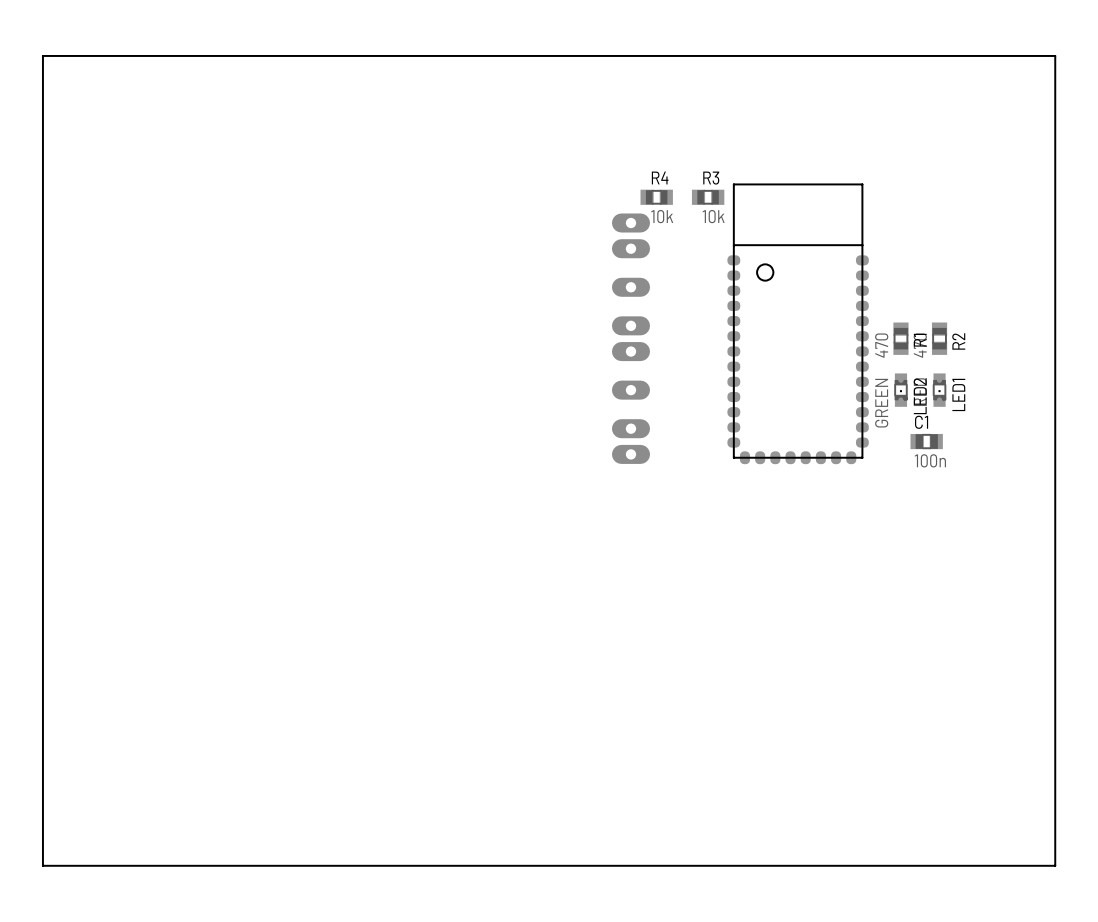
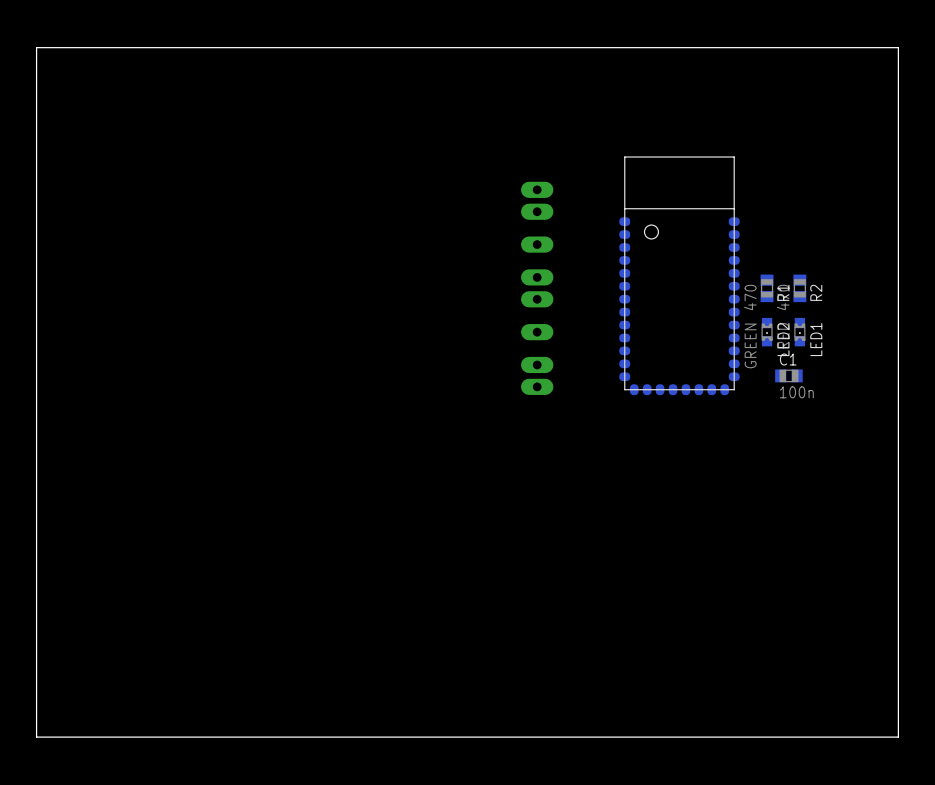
R4: 10k (656, 197) -> none
R3: 10k (708, 197) -> none

